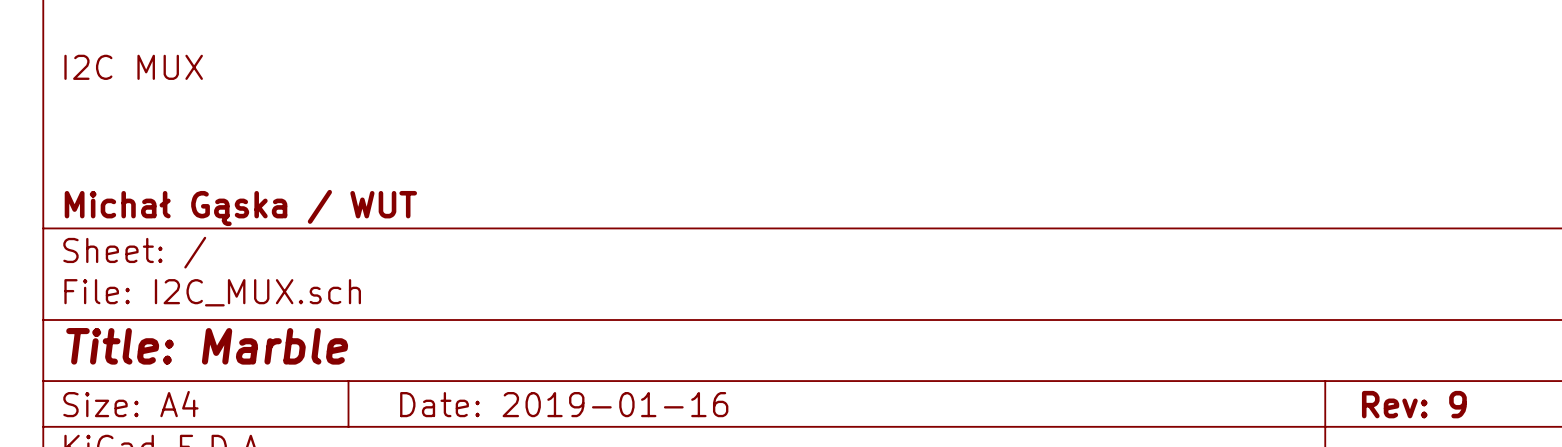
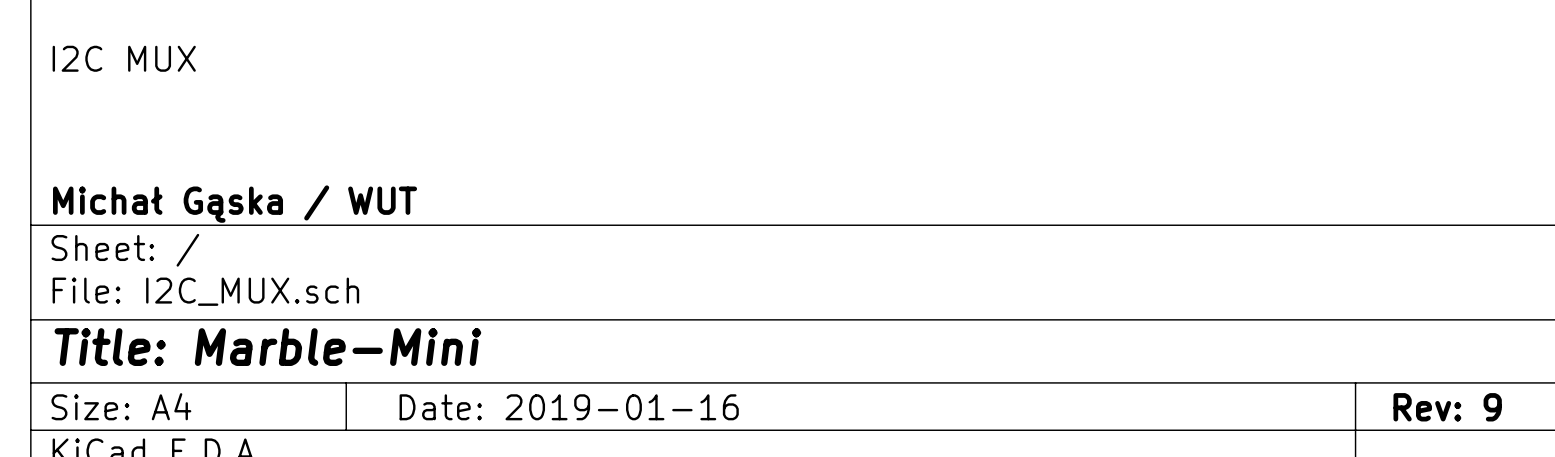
title block: Title: Marble (207, 346) -> Title: Marble-Mini (267, 347)

